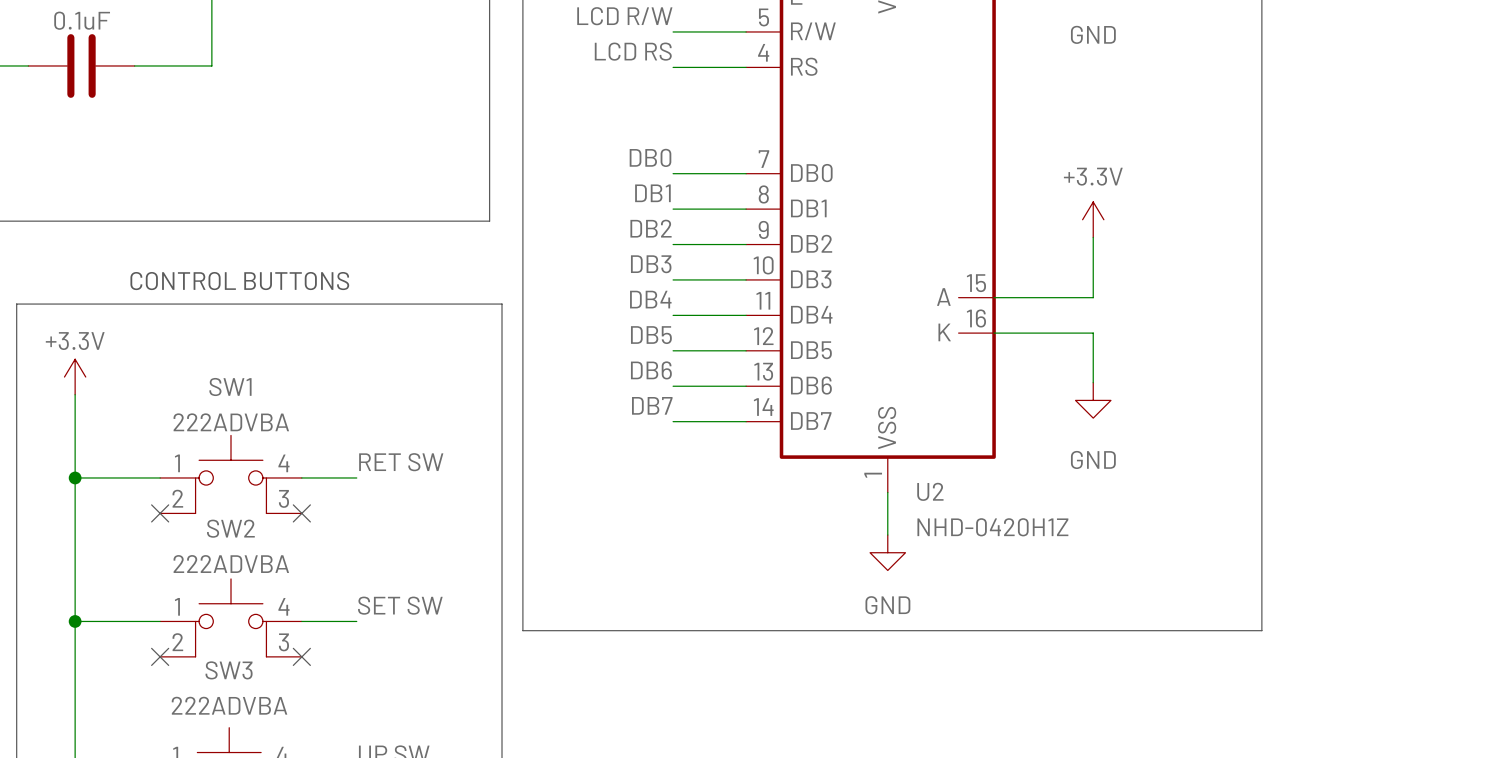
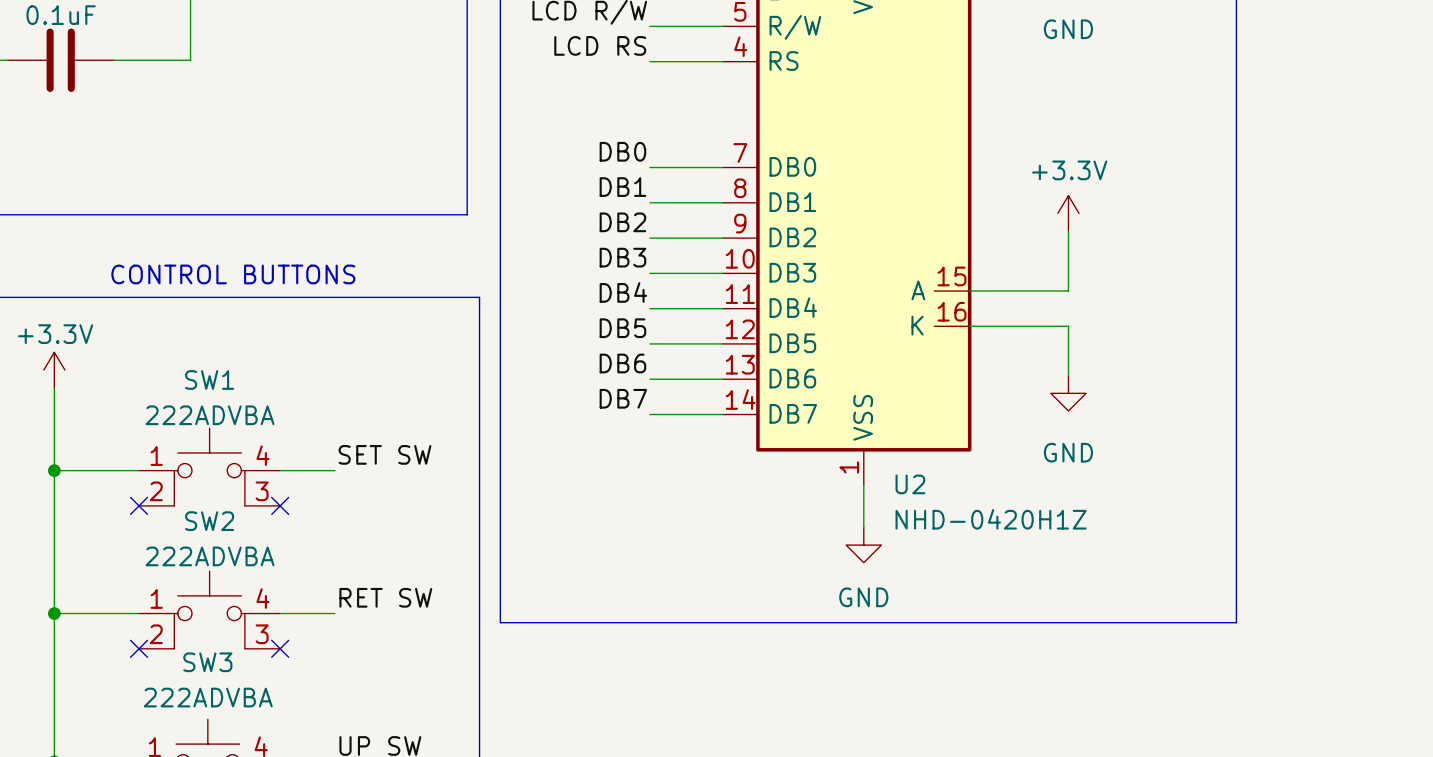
label: RET SW (401, 462) -> SET SW (384, 454)
label: SET SW (400, 605) -> RET SW (385, 597)

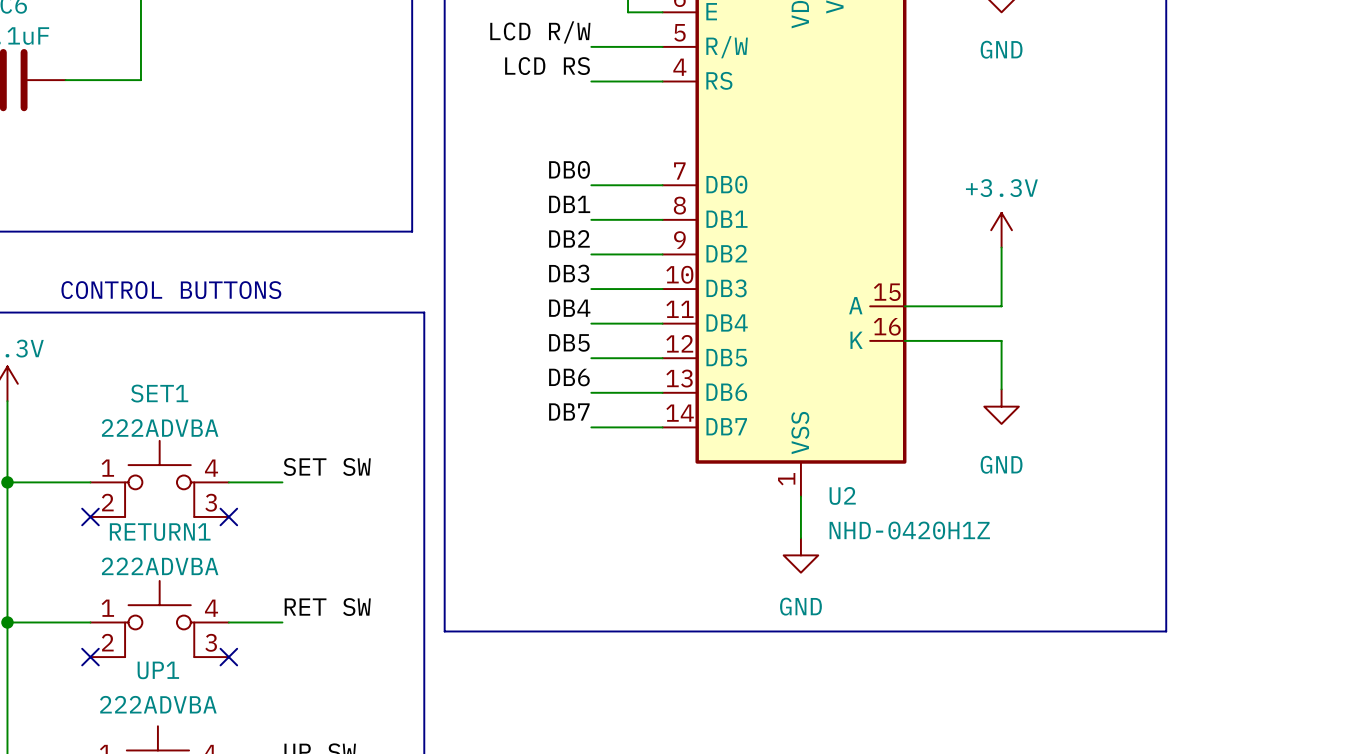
SW1 name: SW1 (209, 379) -> SET1 (159, 393)
SW2 name: SW2 (209, 521) -> RETURN1 (160, 532)
SW3 name: SW3 (207, 662) -> UP1 (158, 670)

